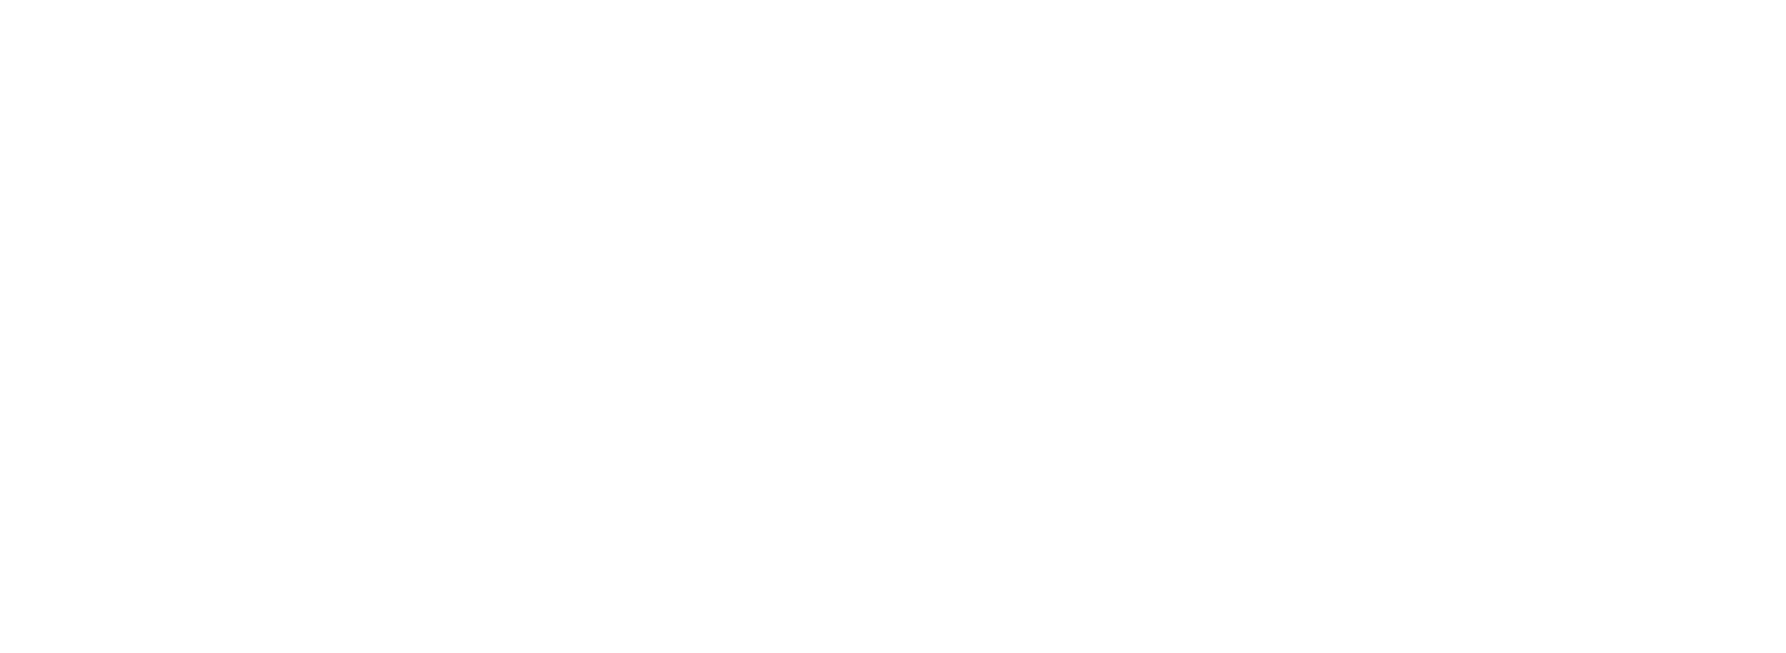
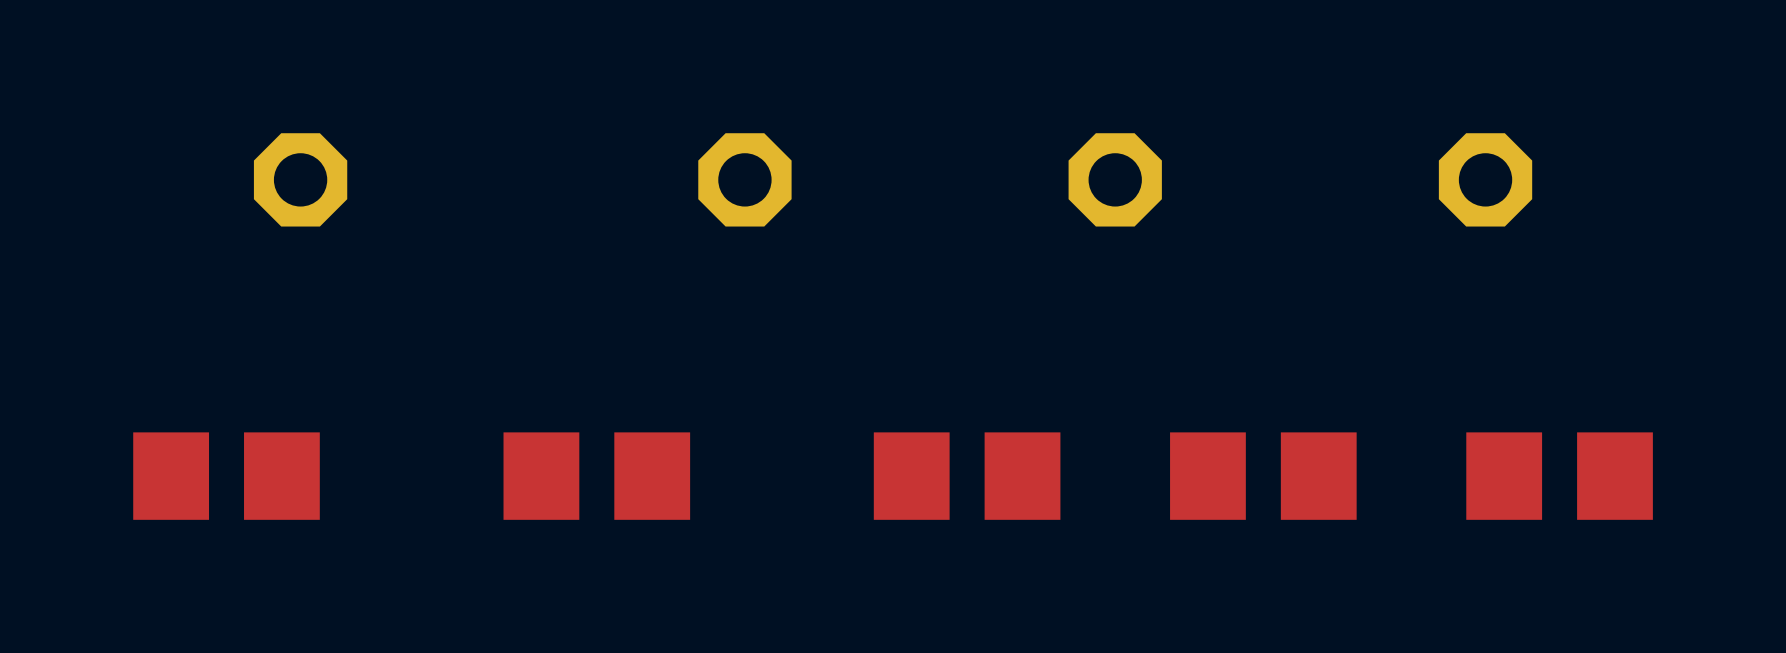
part: none -> (300, 179)
part: none -> (744, 179)
part: none -> (1115, 179)
part: none -> (1485, 179)
part: none -> (226, 476)
part: none -> (596, 476)
part: none -> (967, 476)
part: none -> (1263, 476)
part: none -> (1559, 476)

